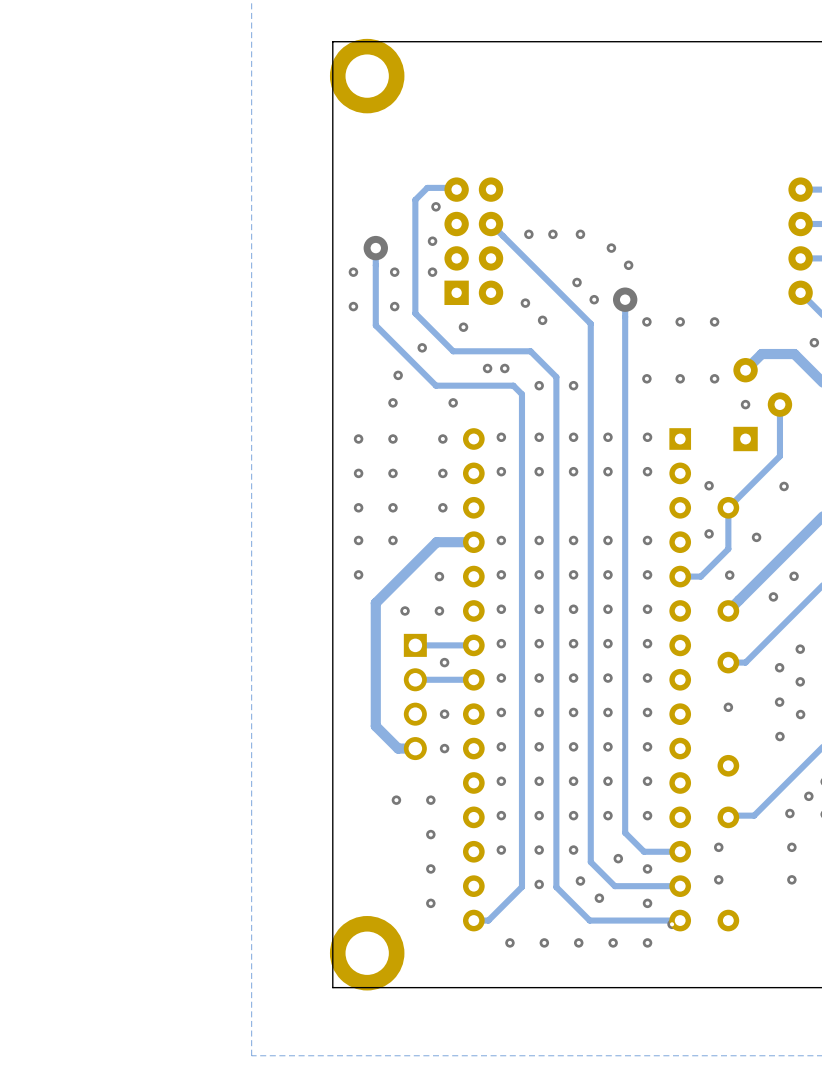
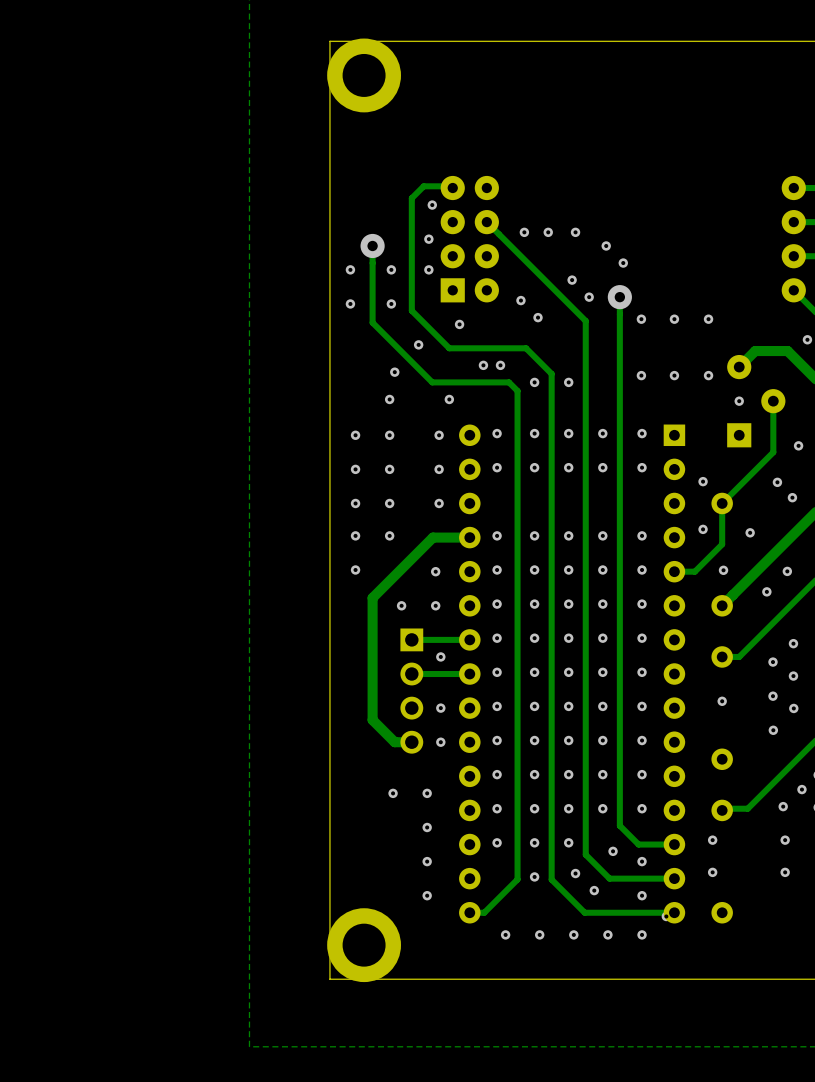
via: none -> (798, 445)
via: none -> (792, 497)

